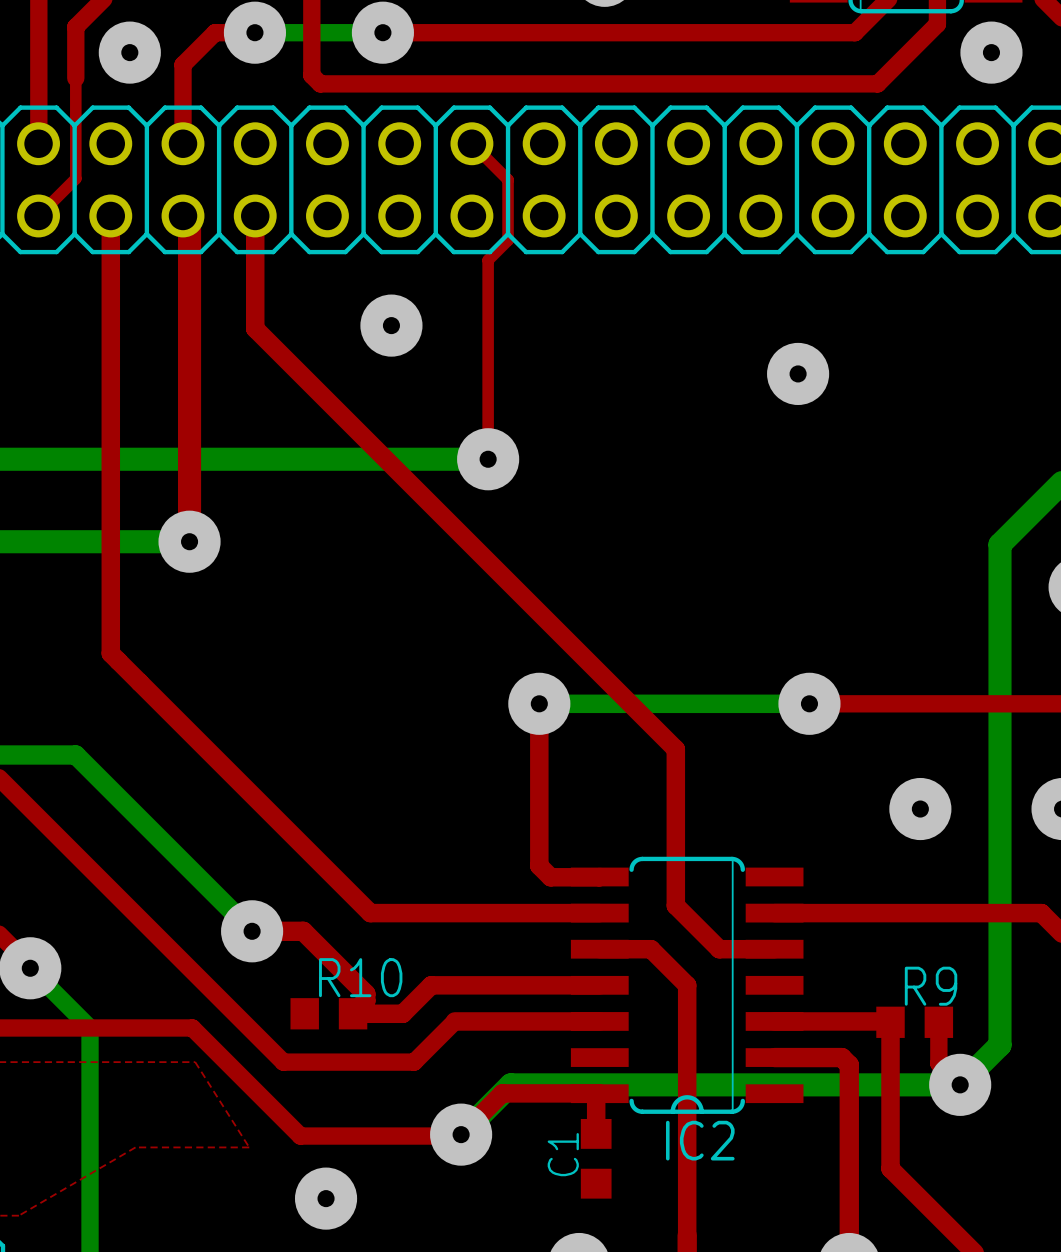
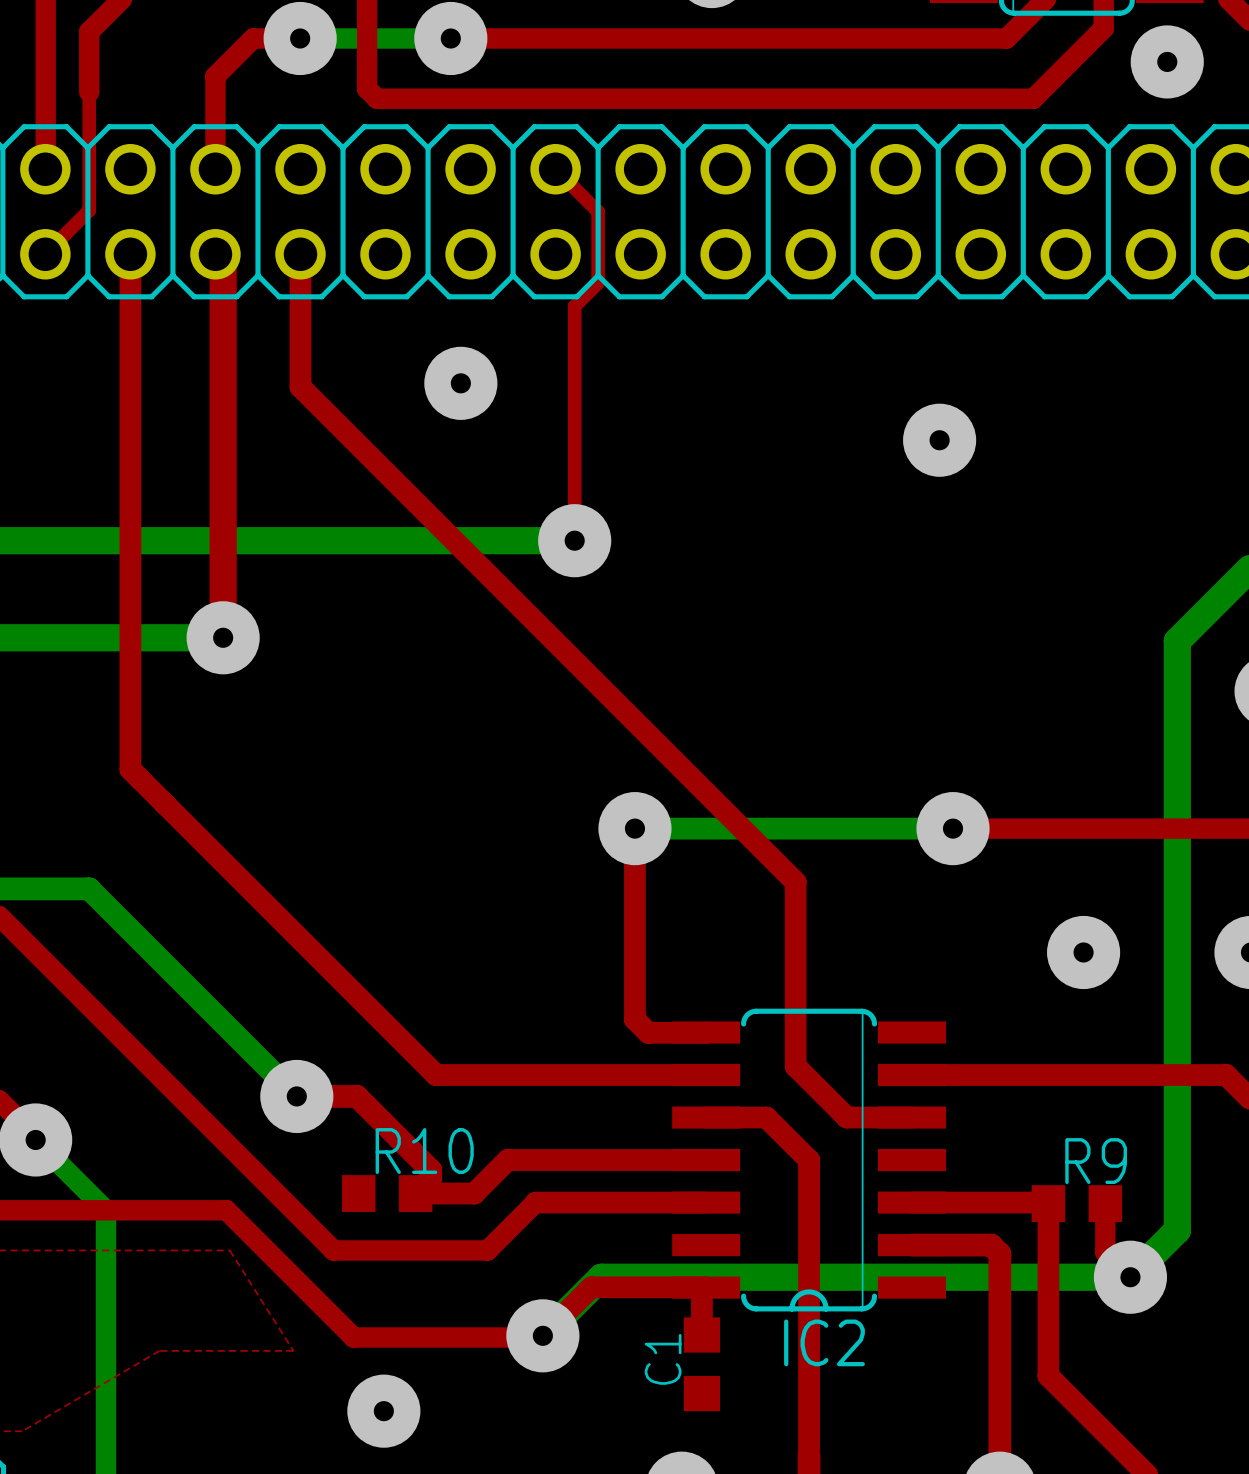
via: (129, 52) -> none

